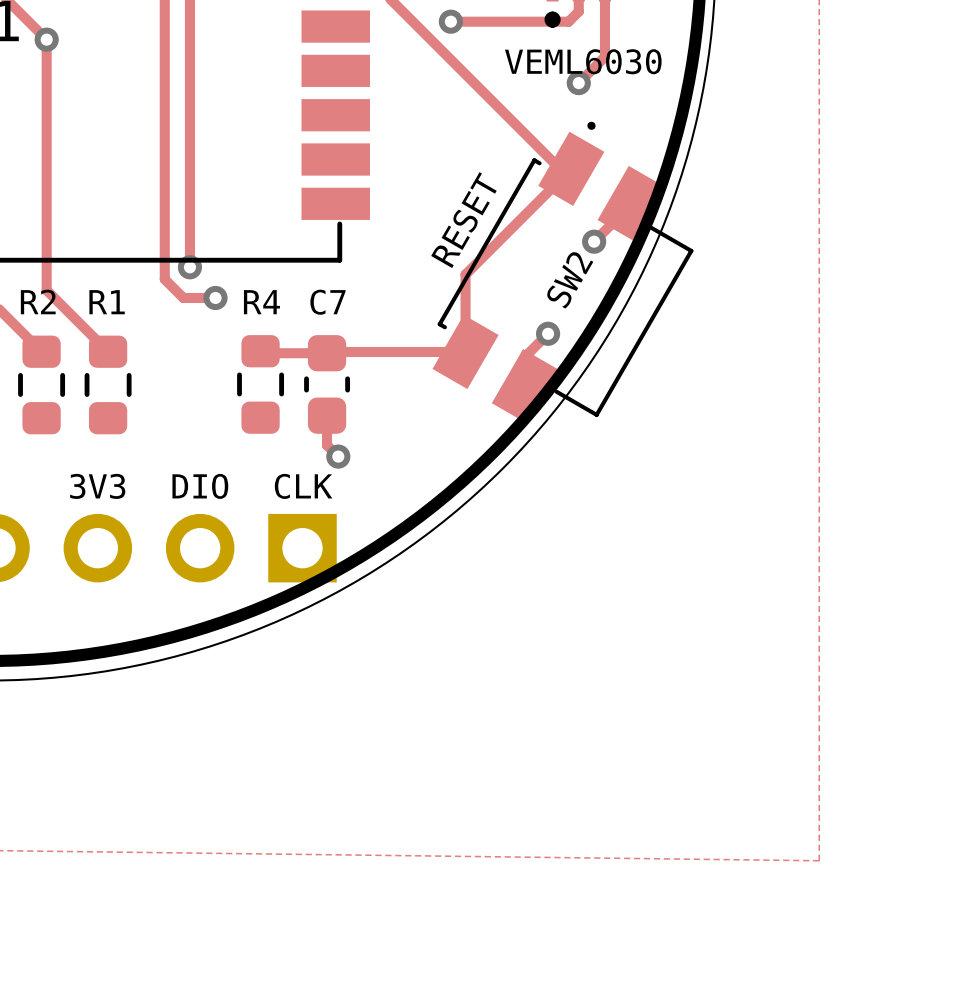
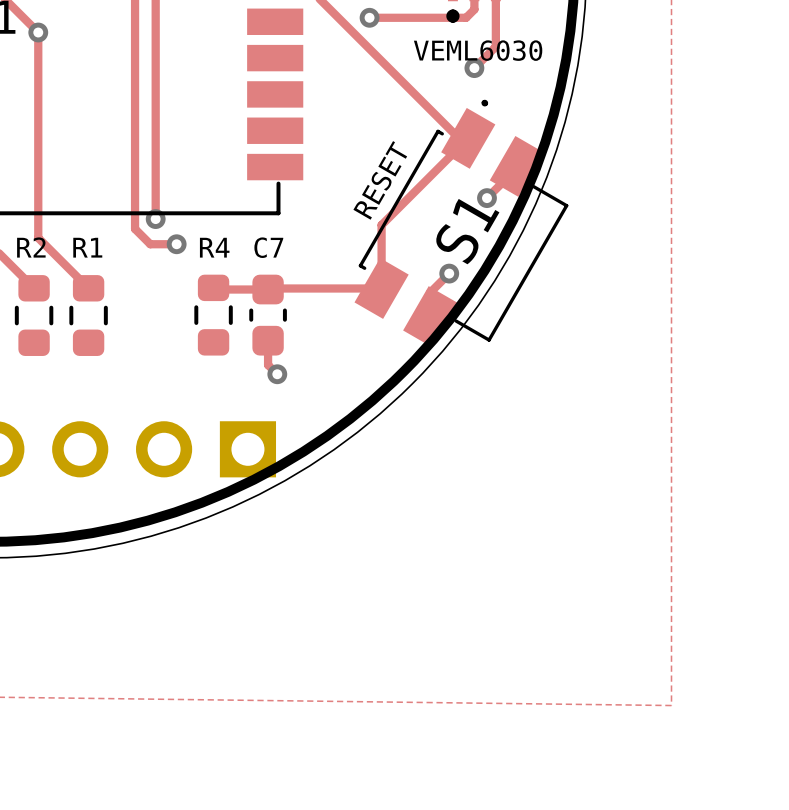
SW2 name: SW2 (570, 280) -> S1 (467, 231)
text: 3V3 (97, 486) -> none
text: DIO (200, 486) -> none
text: CLK (303, 486) -> none

